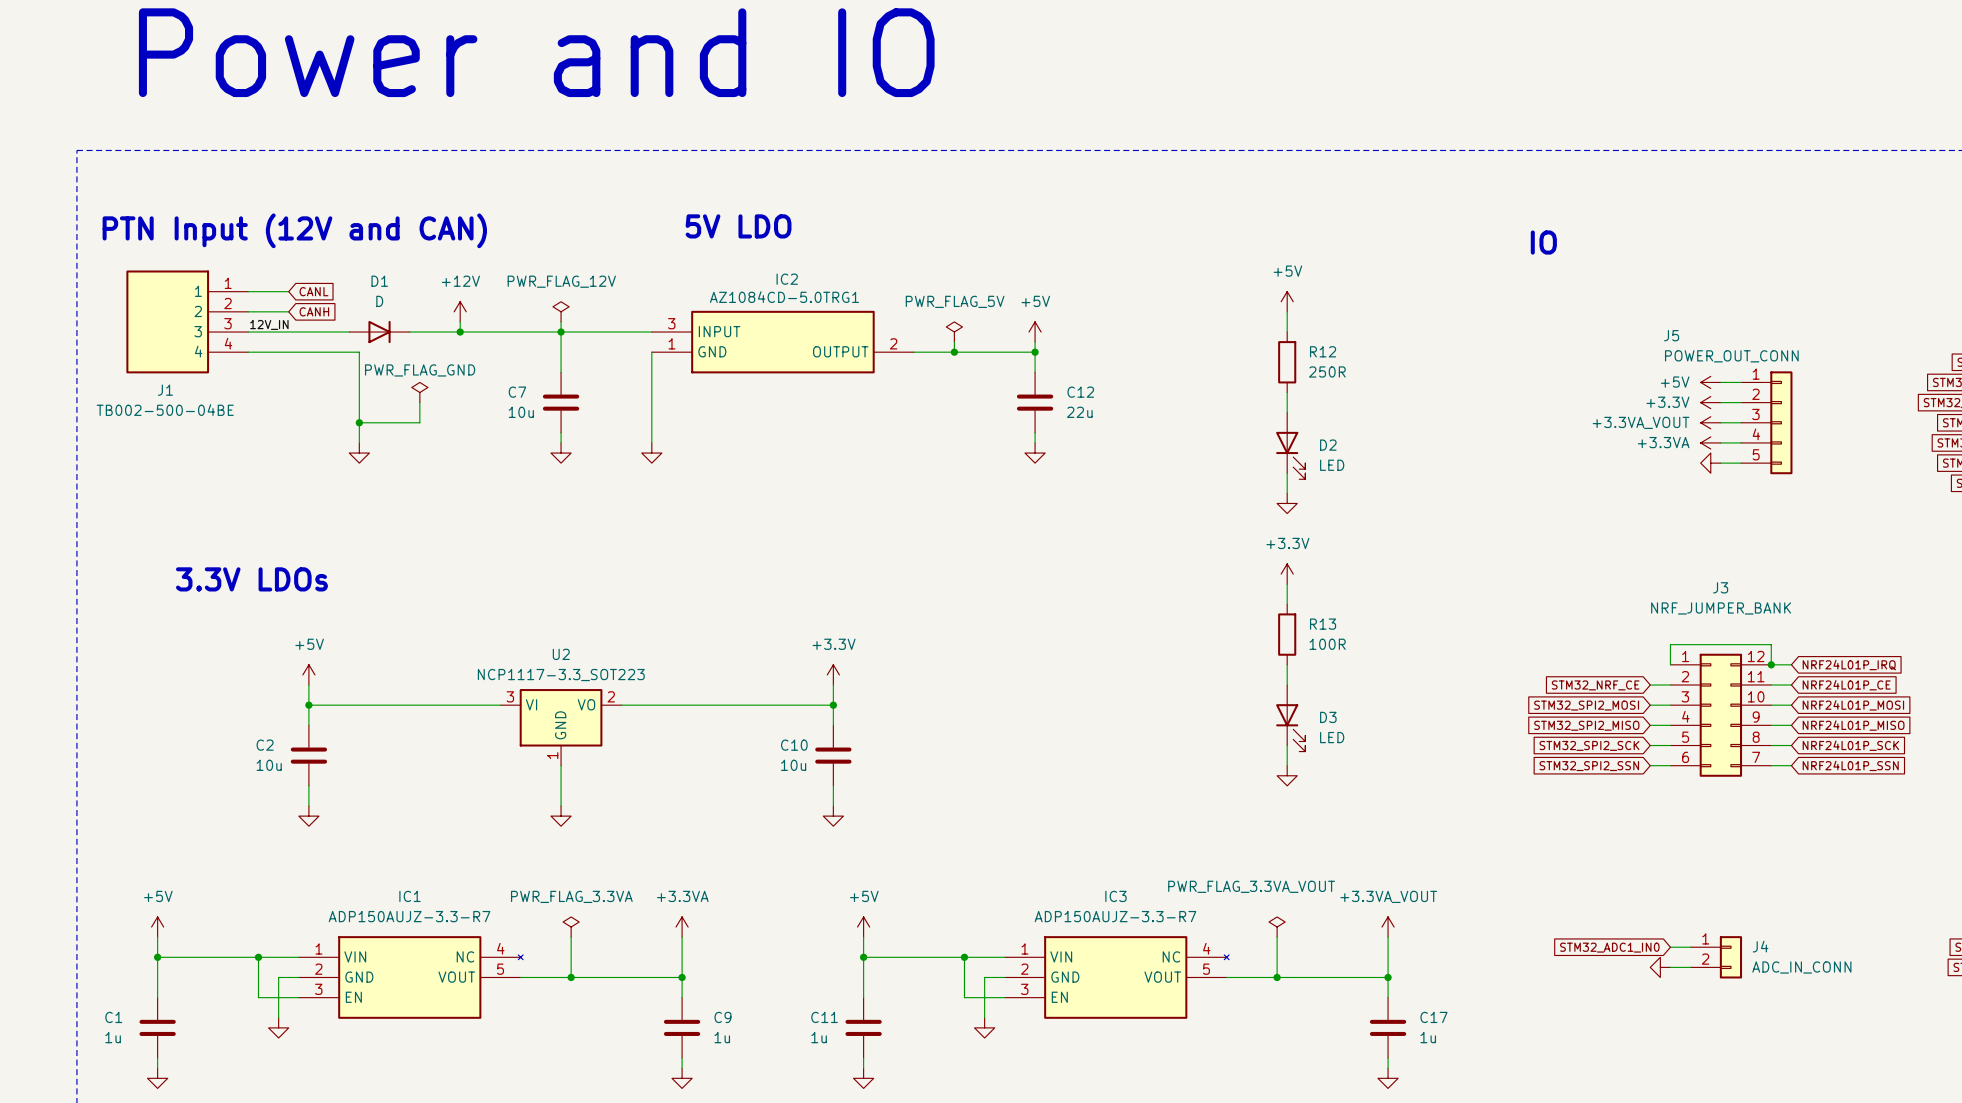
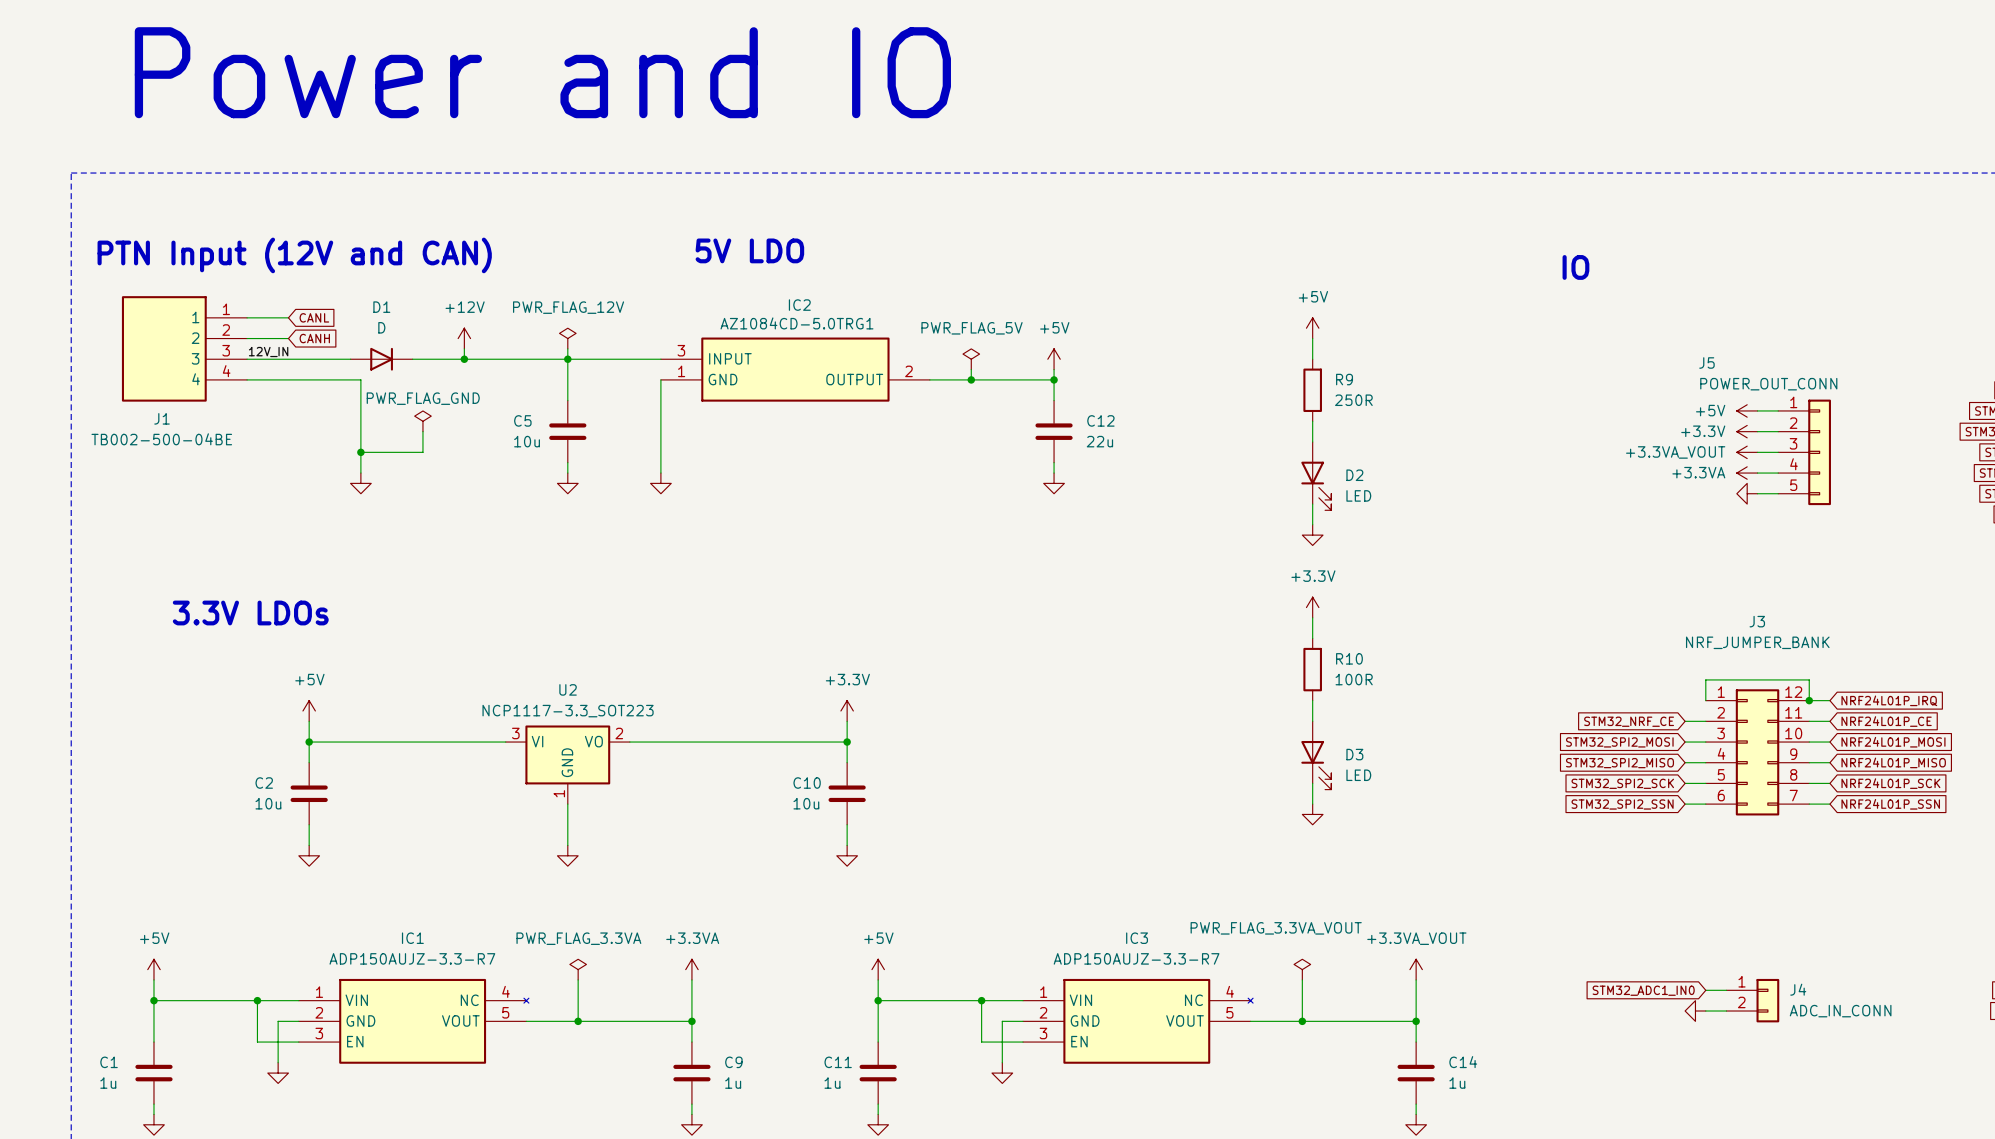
R12 name: R12 (1323, 351) -> R9 (1344, 379)
C7 name: C7 (517, 392) -> C5 (522, 420)
R13 name: R13 (1323, 624) -> R10 (1349, 658)
C17 name: C17 (1433, 1017) -> C14 (1463, 1062)

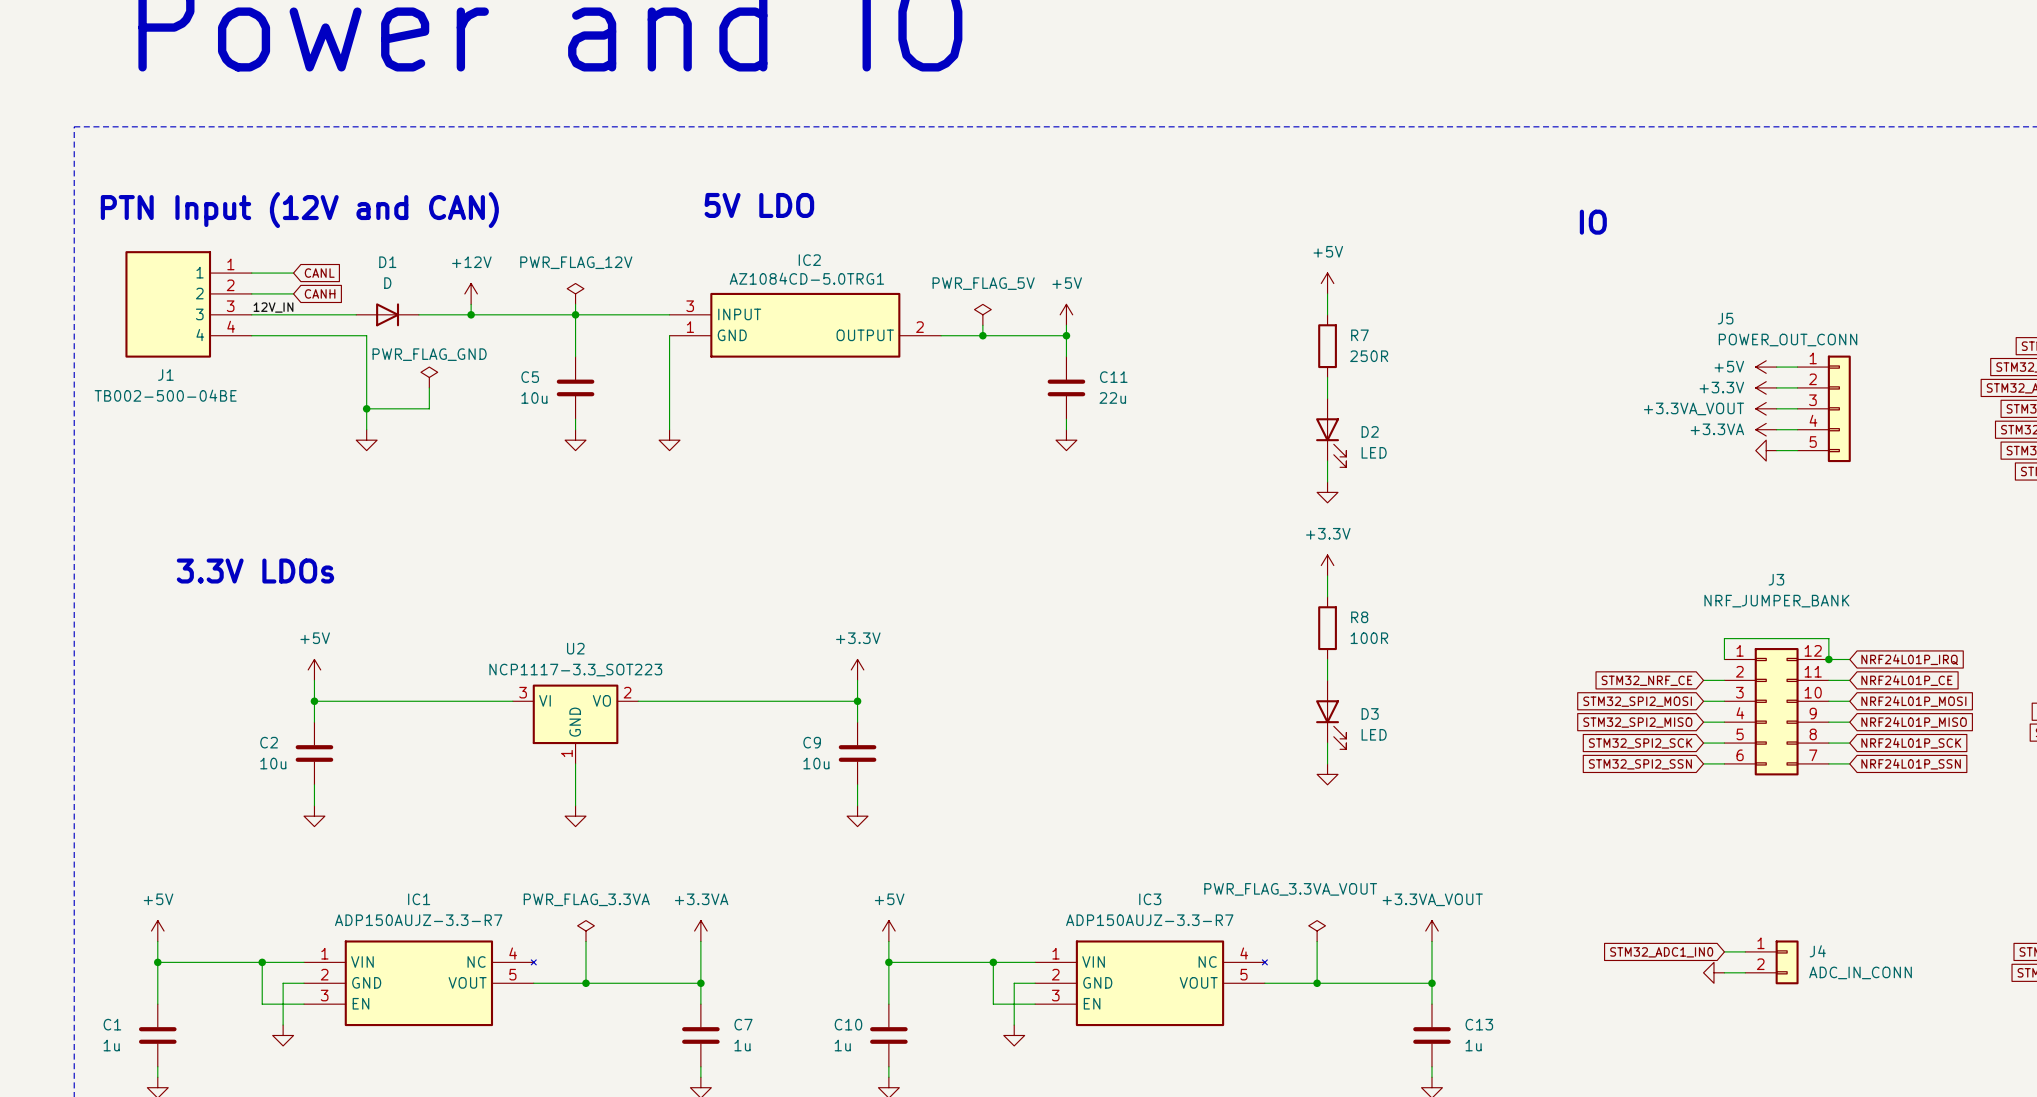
R9 name: R9 (1344, 379) -> R7 (1359, 335)
C12 name: C12 (1100, 420) -> C11 (1113, 377)
R10 name: R10 (1349, 658) -> R8 (1359, 617)
C10 name: C10 (807, 783) -> C9 (812, 742)
C9 name: C9 (733, 1062) -> C7 (743, 1024)
C11 name: C11 (838, 1062) -> C10 (848, 1024)
C14 name: C14 (1463, 1062) -> C13 (1479, 1024)

